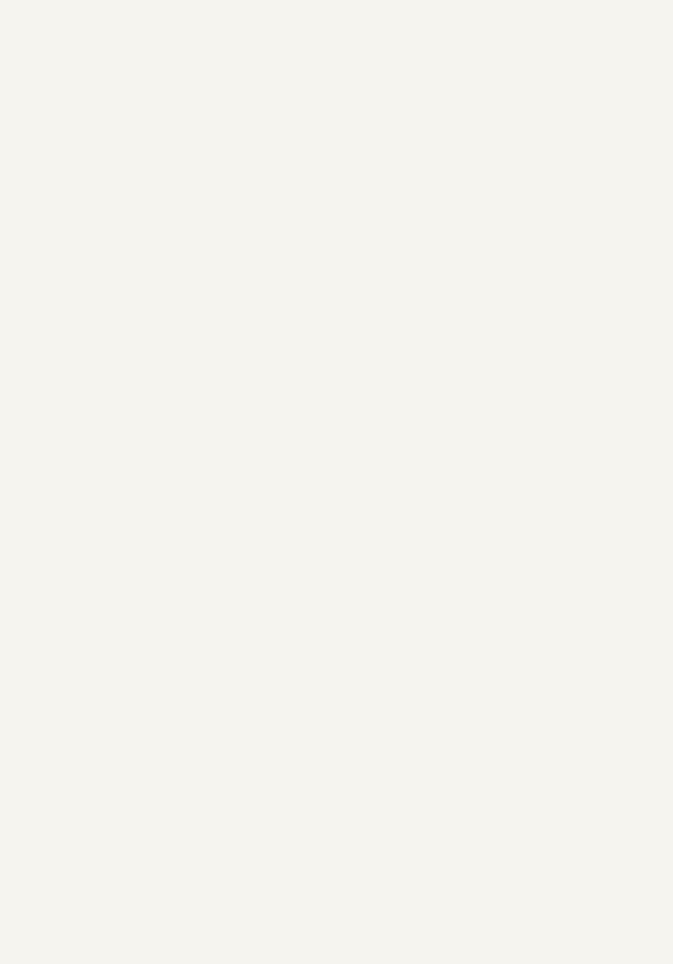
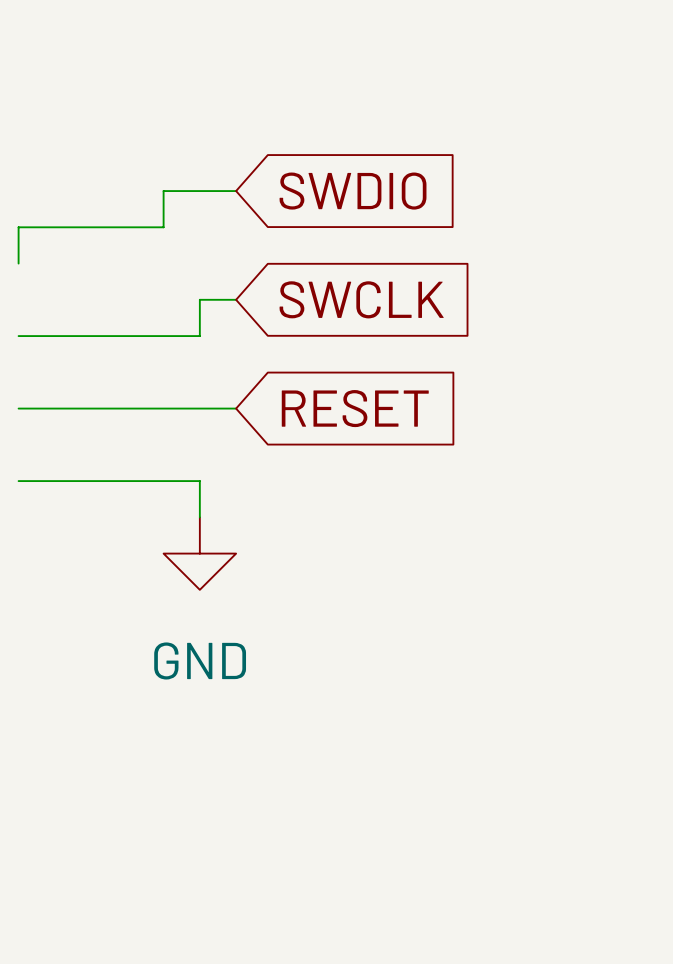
wire: none -> (236, 191) (163, 191) (163, 227) (18, 227) (18, 263)
global label: none -> SWDIO (353, 191)
wire: none -> (236, 299) (199, 299) (199, 336) (18, 336)
global label: none -> SWCLK (361, 299)
wire: none -> (18, 408) (236, 408)
global label: none -> RESET (355, 408)
wire: none -> (18, 481) (199, 481) (199, 517)
power symbol: none -> GND (199, 553)

